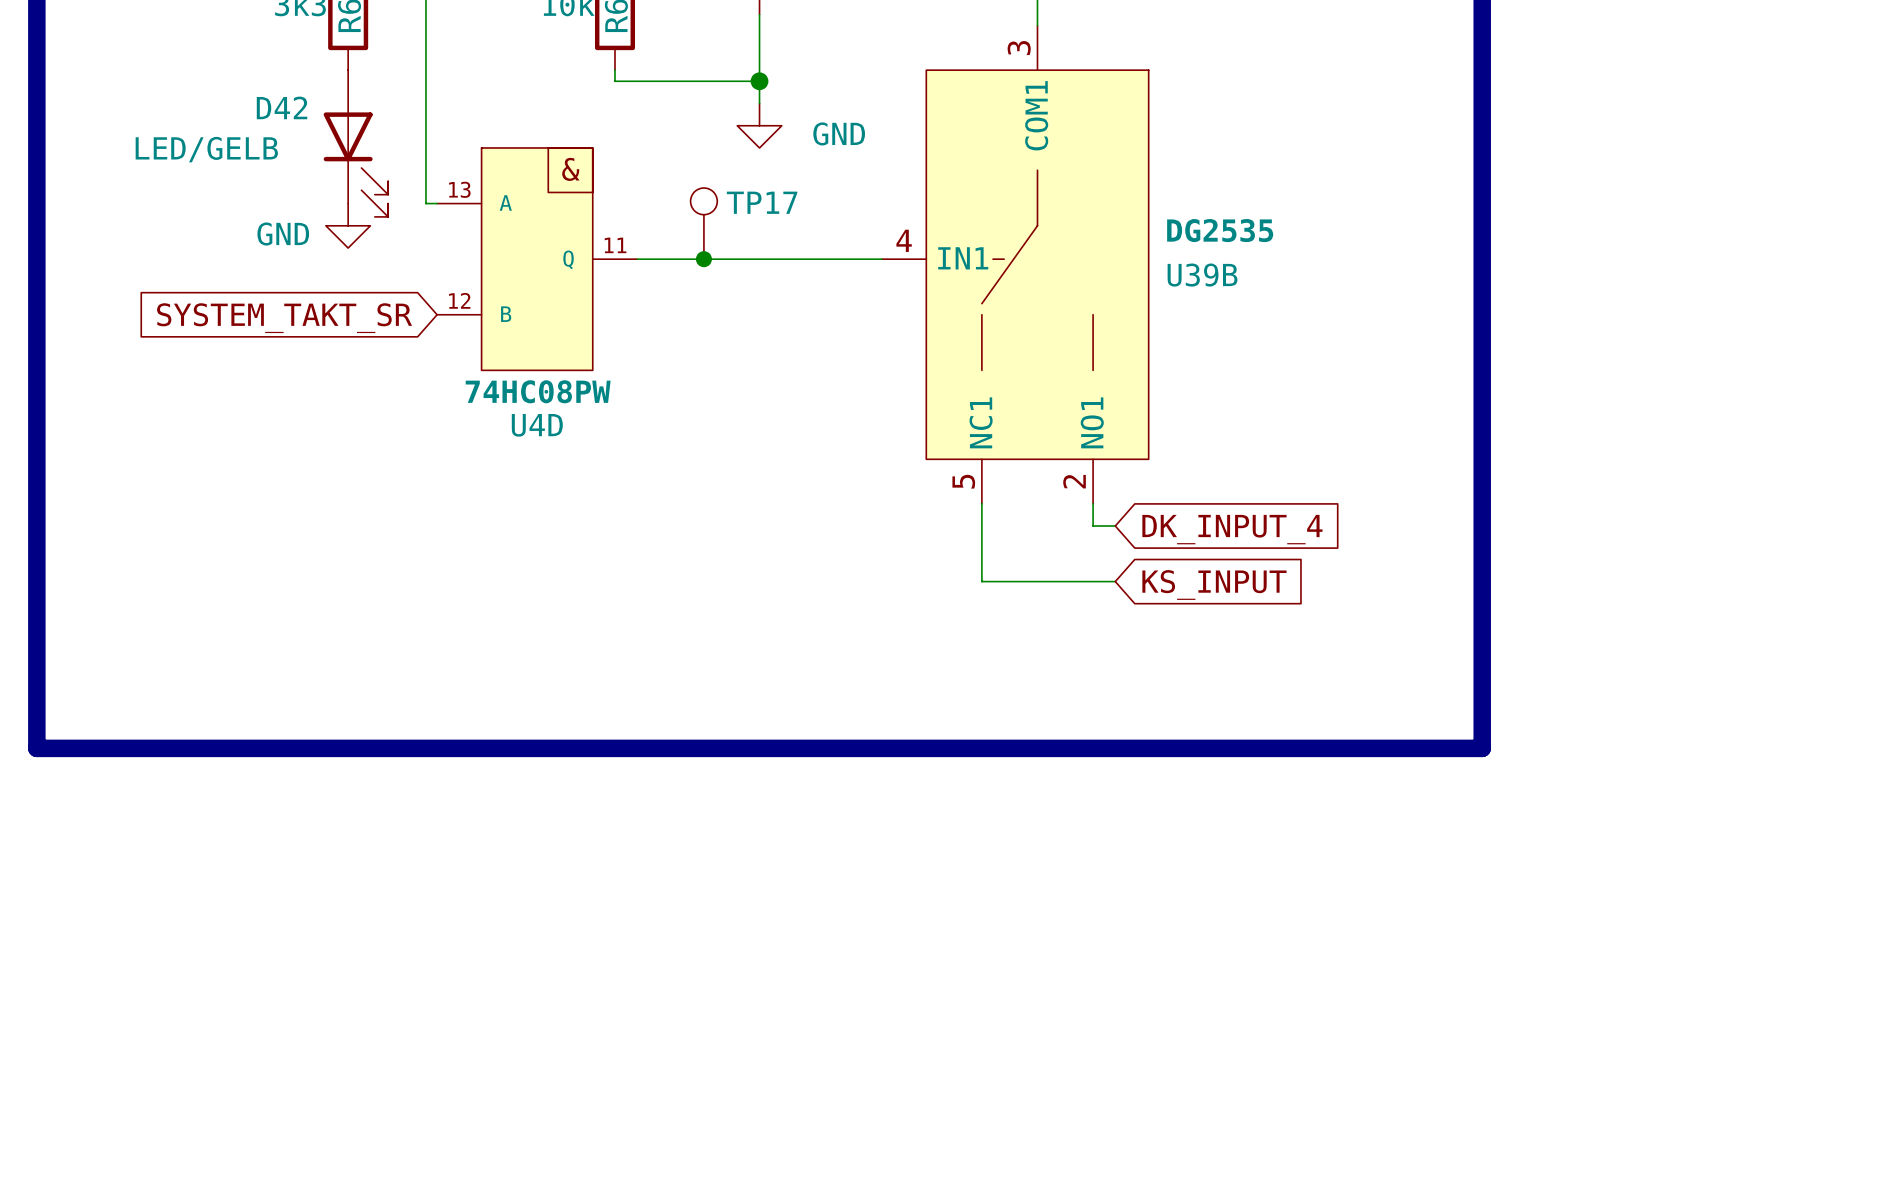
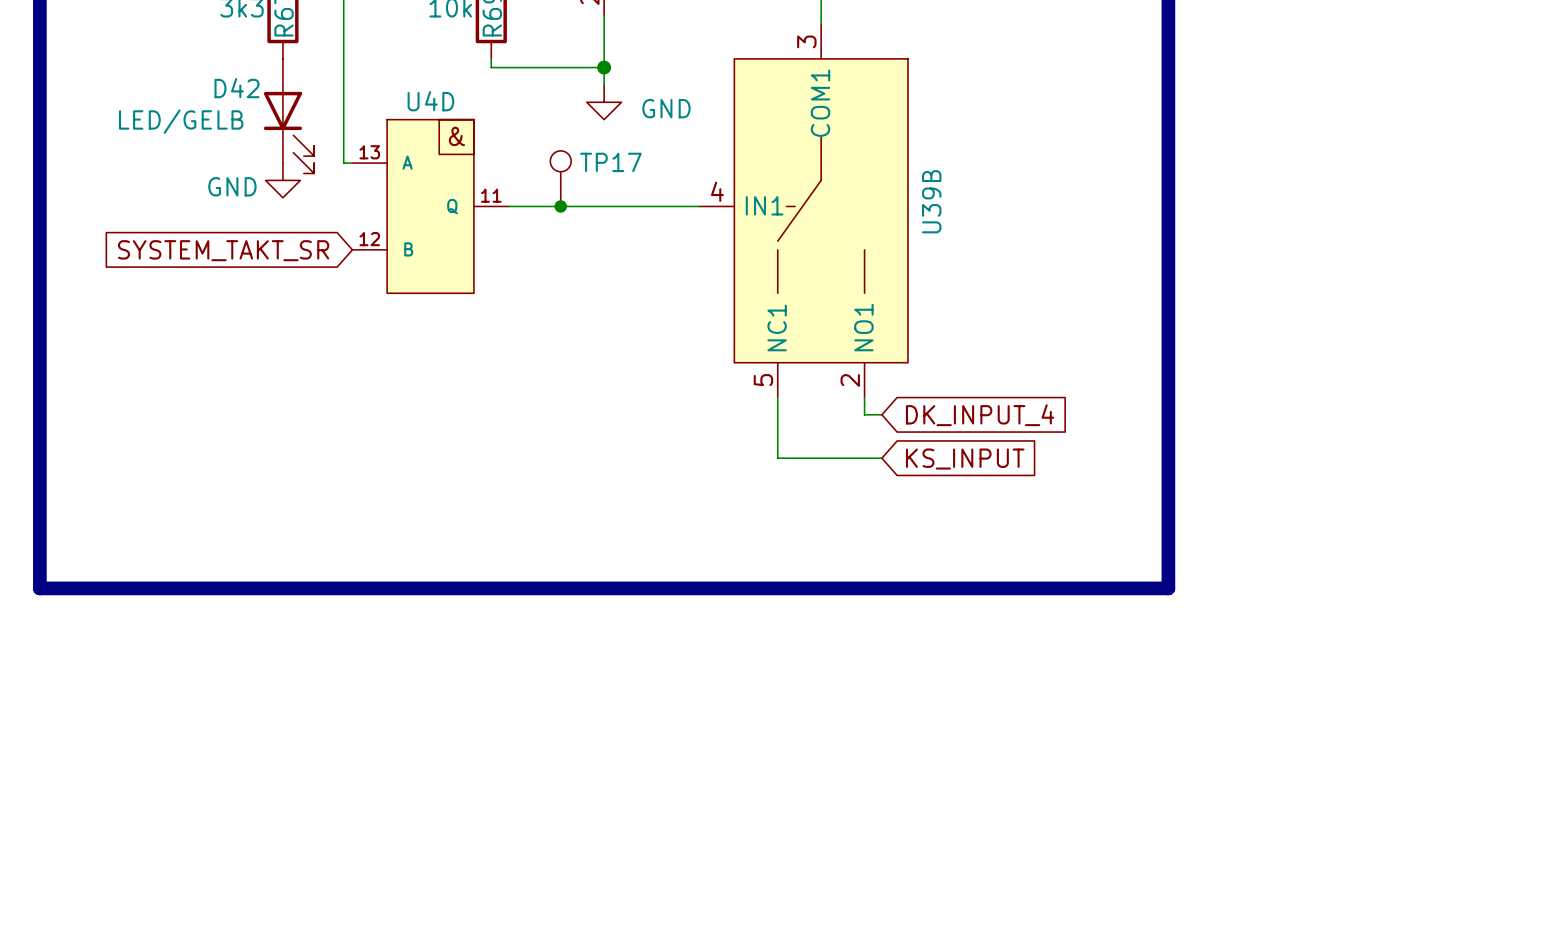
U39B value: DG2535 (1220, 230) -> none
U39B name rotation: 0° (1202, 275) -> 90° counterclockwise (931, 201)
U4D value: 74HC08PW (538, 391) -> none
U4D name position: U4D (537, 425) -> U4D (430, 101)

